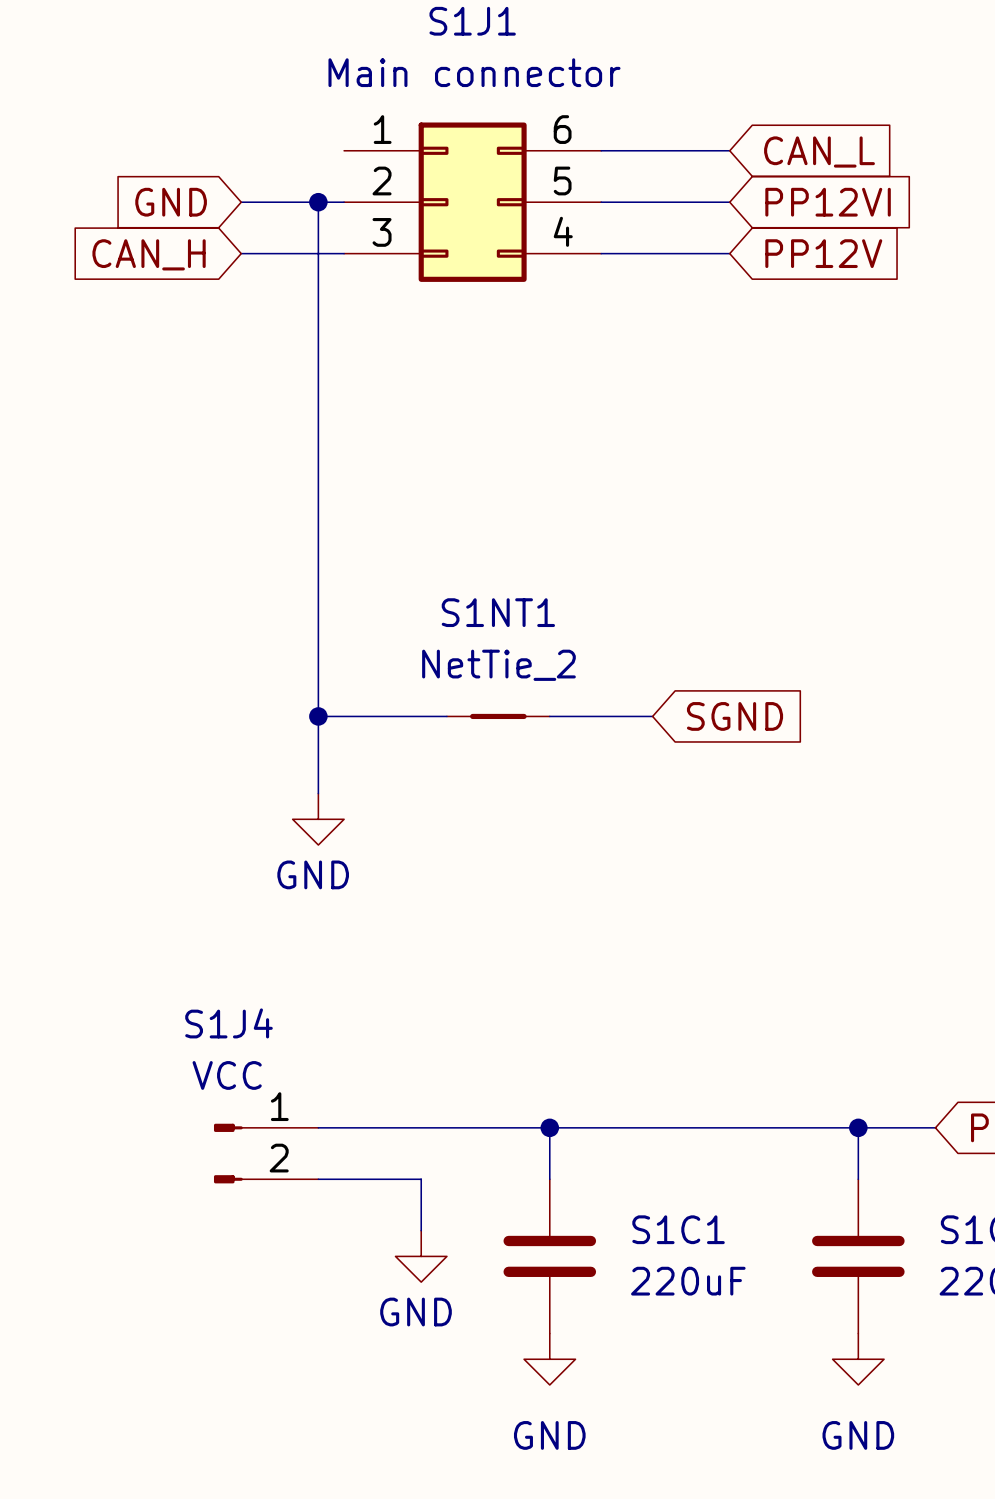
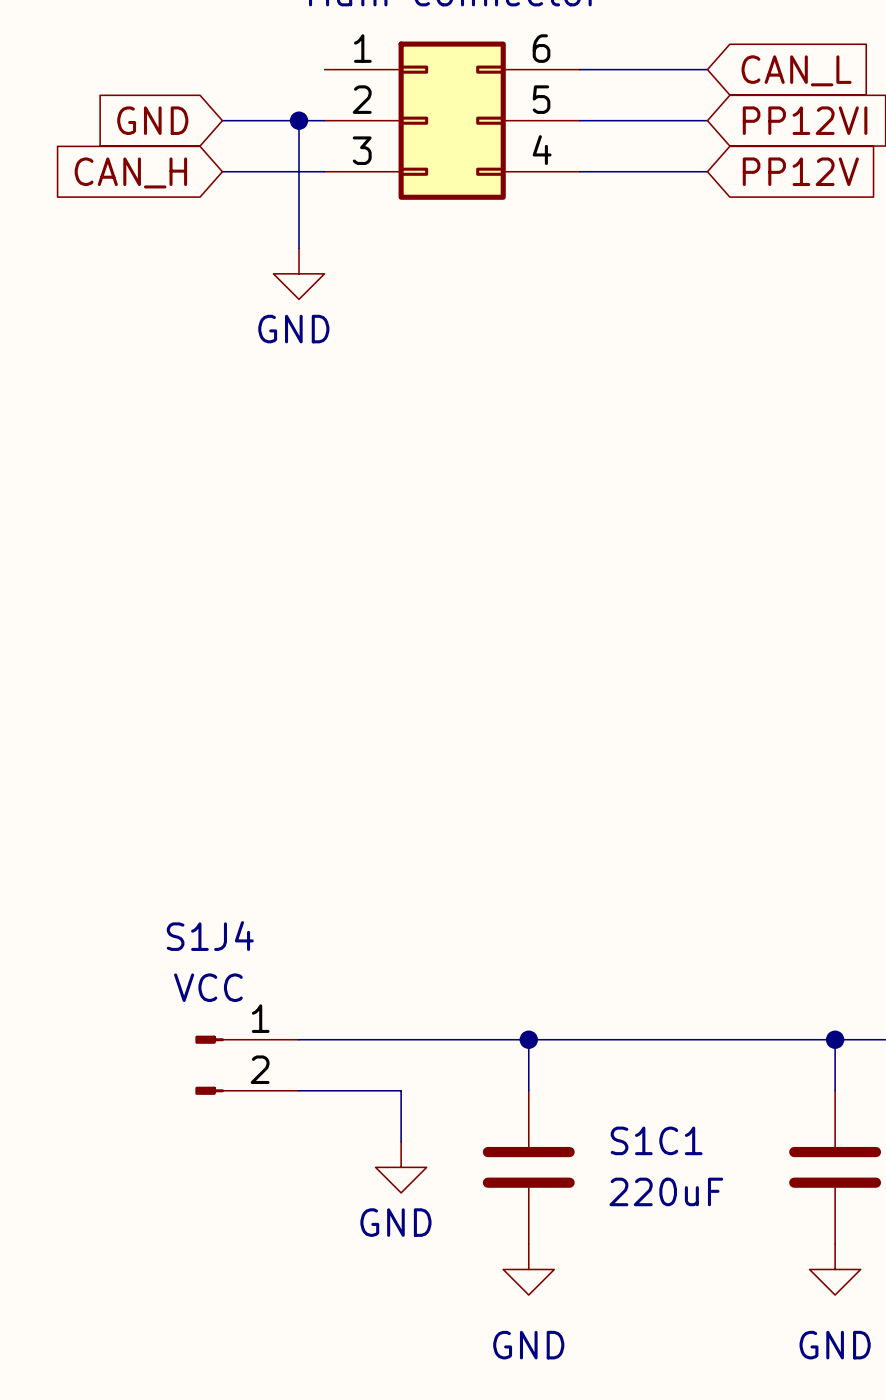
wire: (318, 330) (318, 793) -> none
wire: (318, 716) (446, 716) -> none
junction: (318, 716) -> none
S1NT1: NetTie_2 (498, 716) -> none
wire: (549, 716) (652, 716) -> none
global label: SGND (735, 716) -> none
power symbol position: GND (318, 819) -> GND (299, 273)

